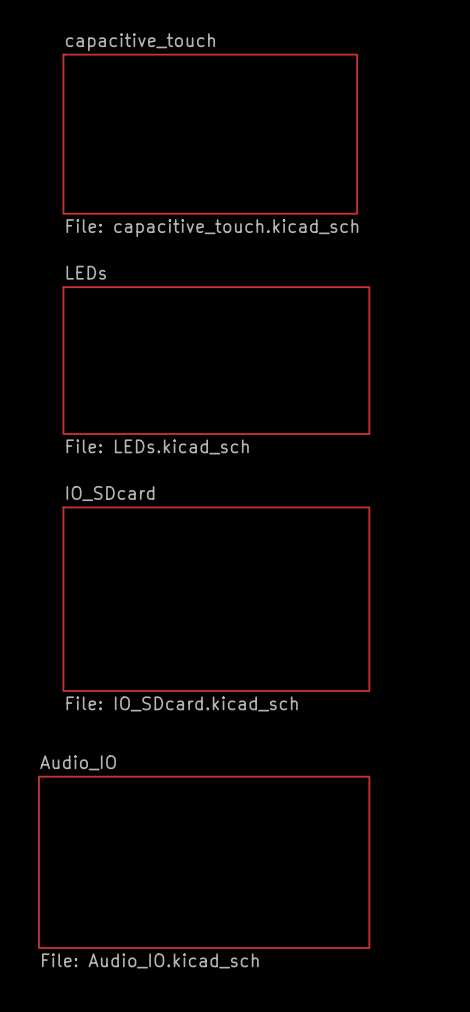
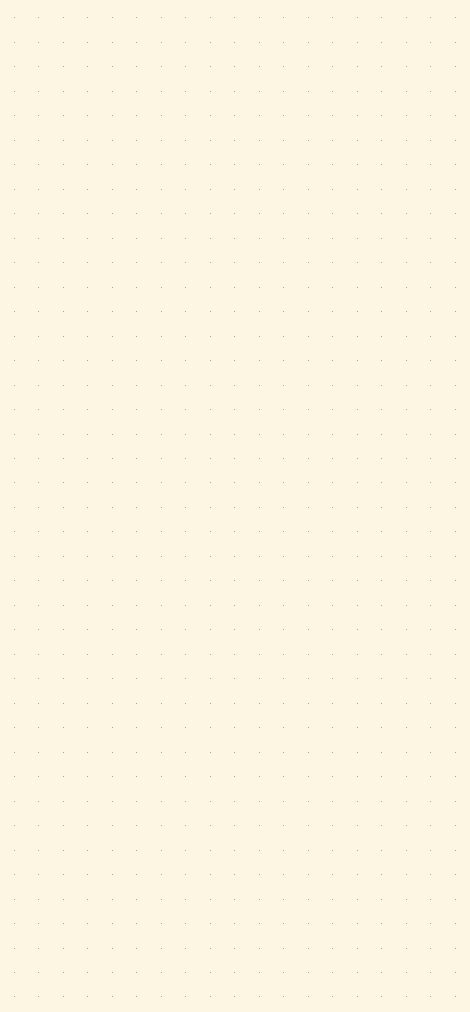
sheet capacitive_touch: File: capacitive_touch.kicad_sch (210, 134) -> none
sheet LEDs: File: LEDs.kicad_sch (216, 360) -> none
sheet IO_SDcard: File: IO_SDcard.kicad_sch (216, 599) -> none
sheet Audio_IO: File: Audio_IO.kicad_sch (204, 862) -> none

